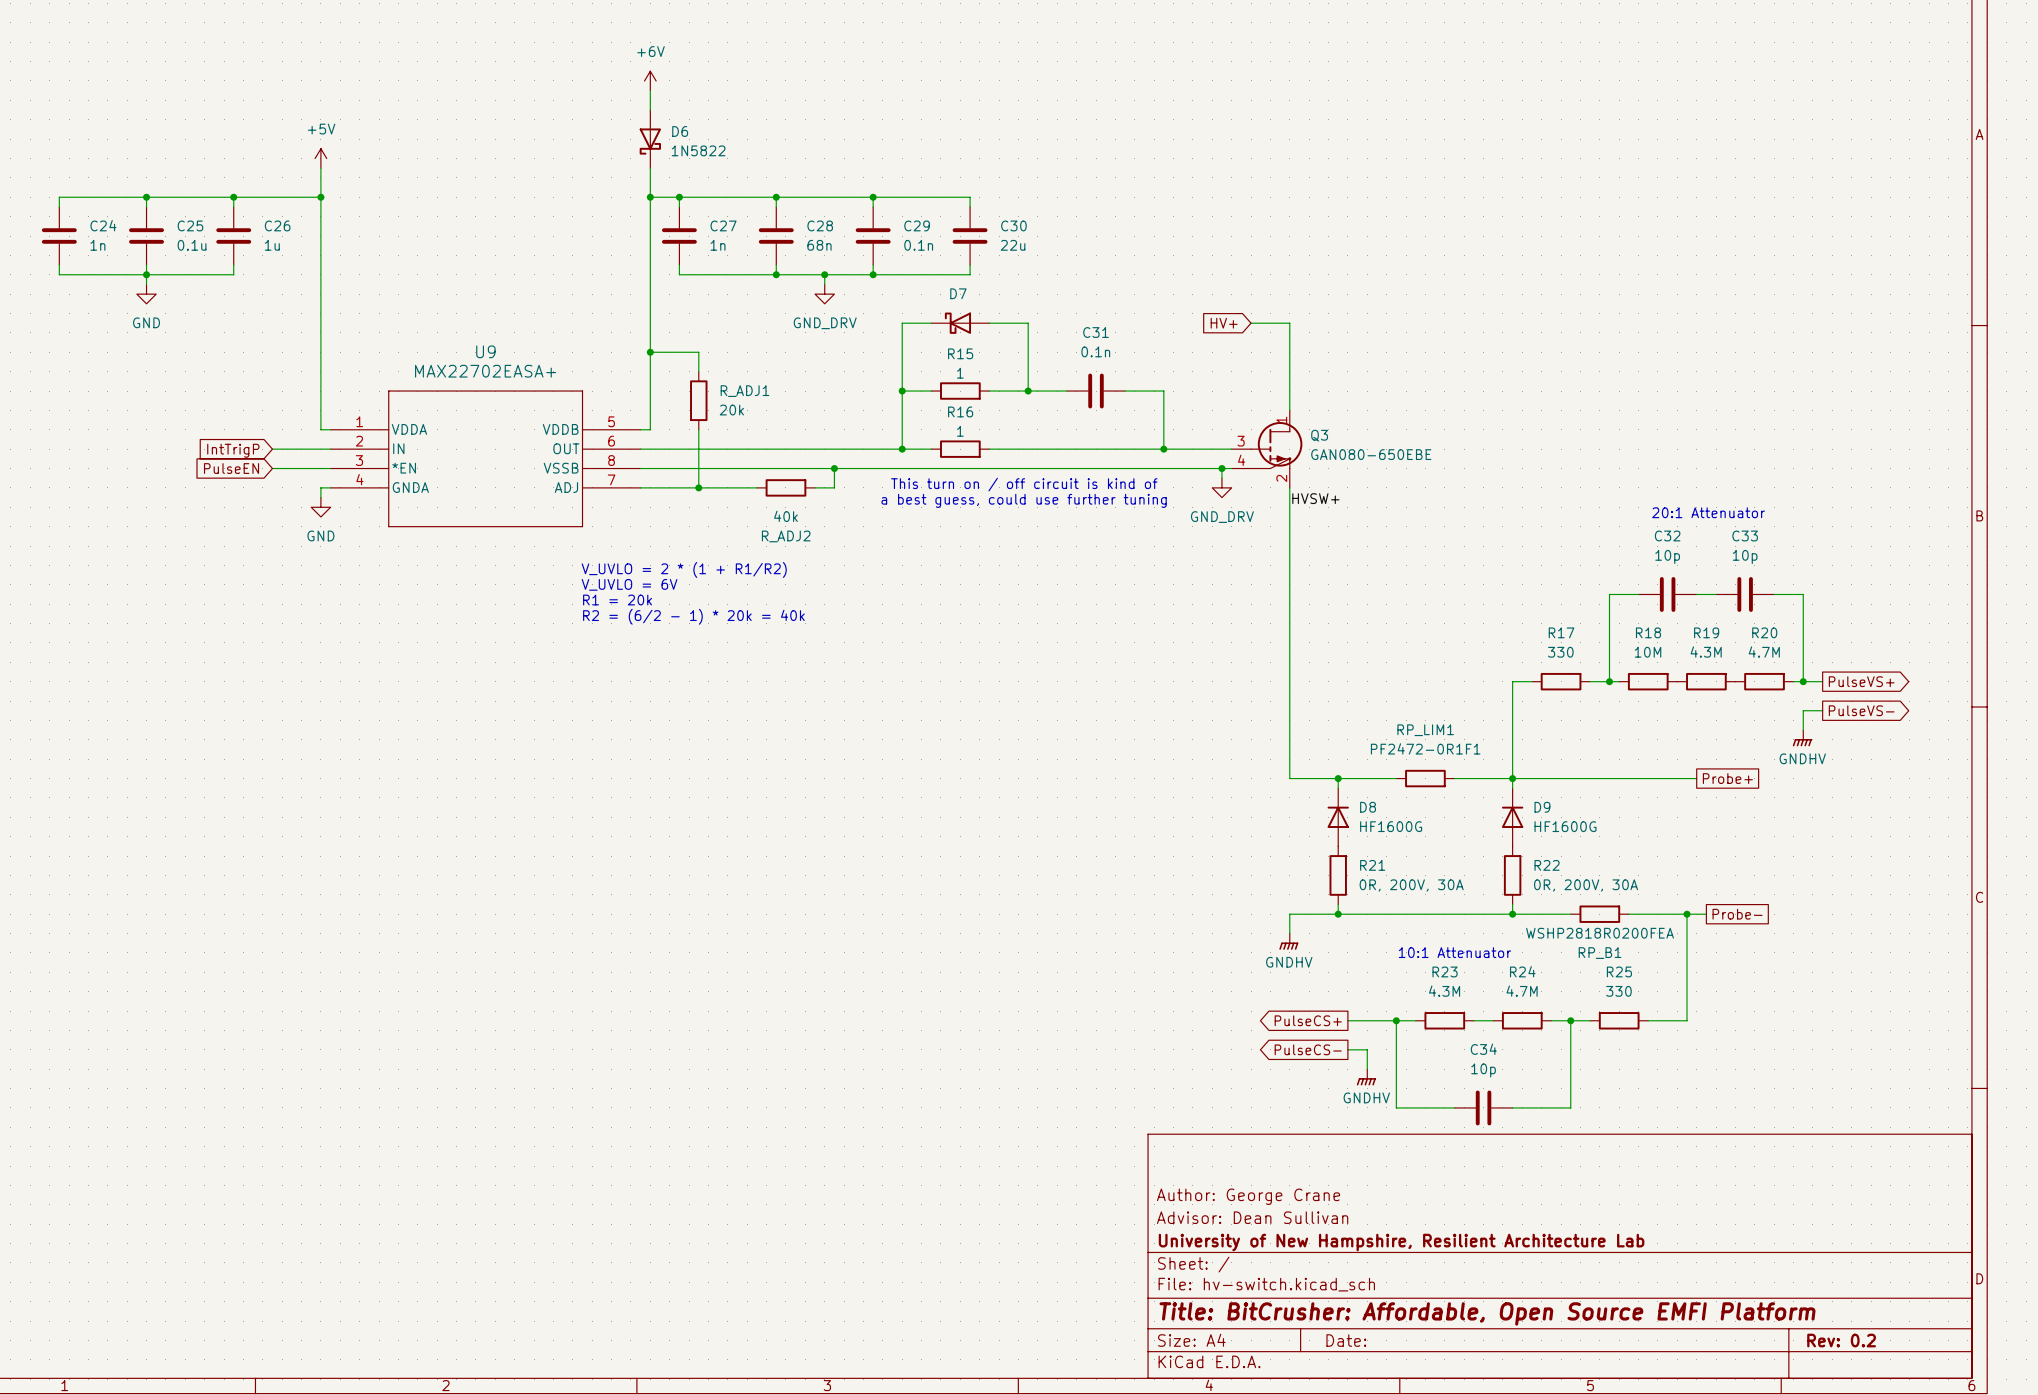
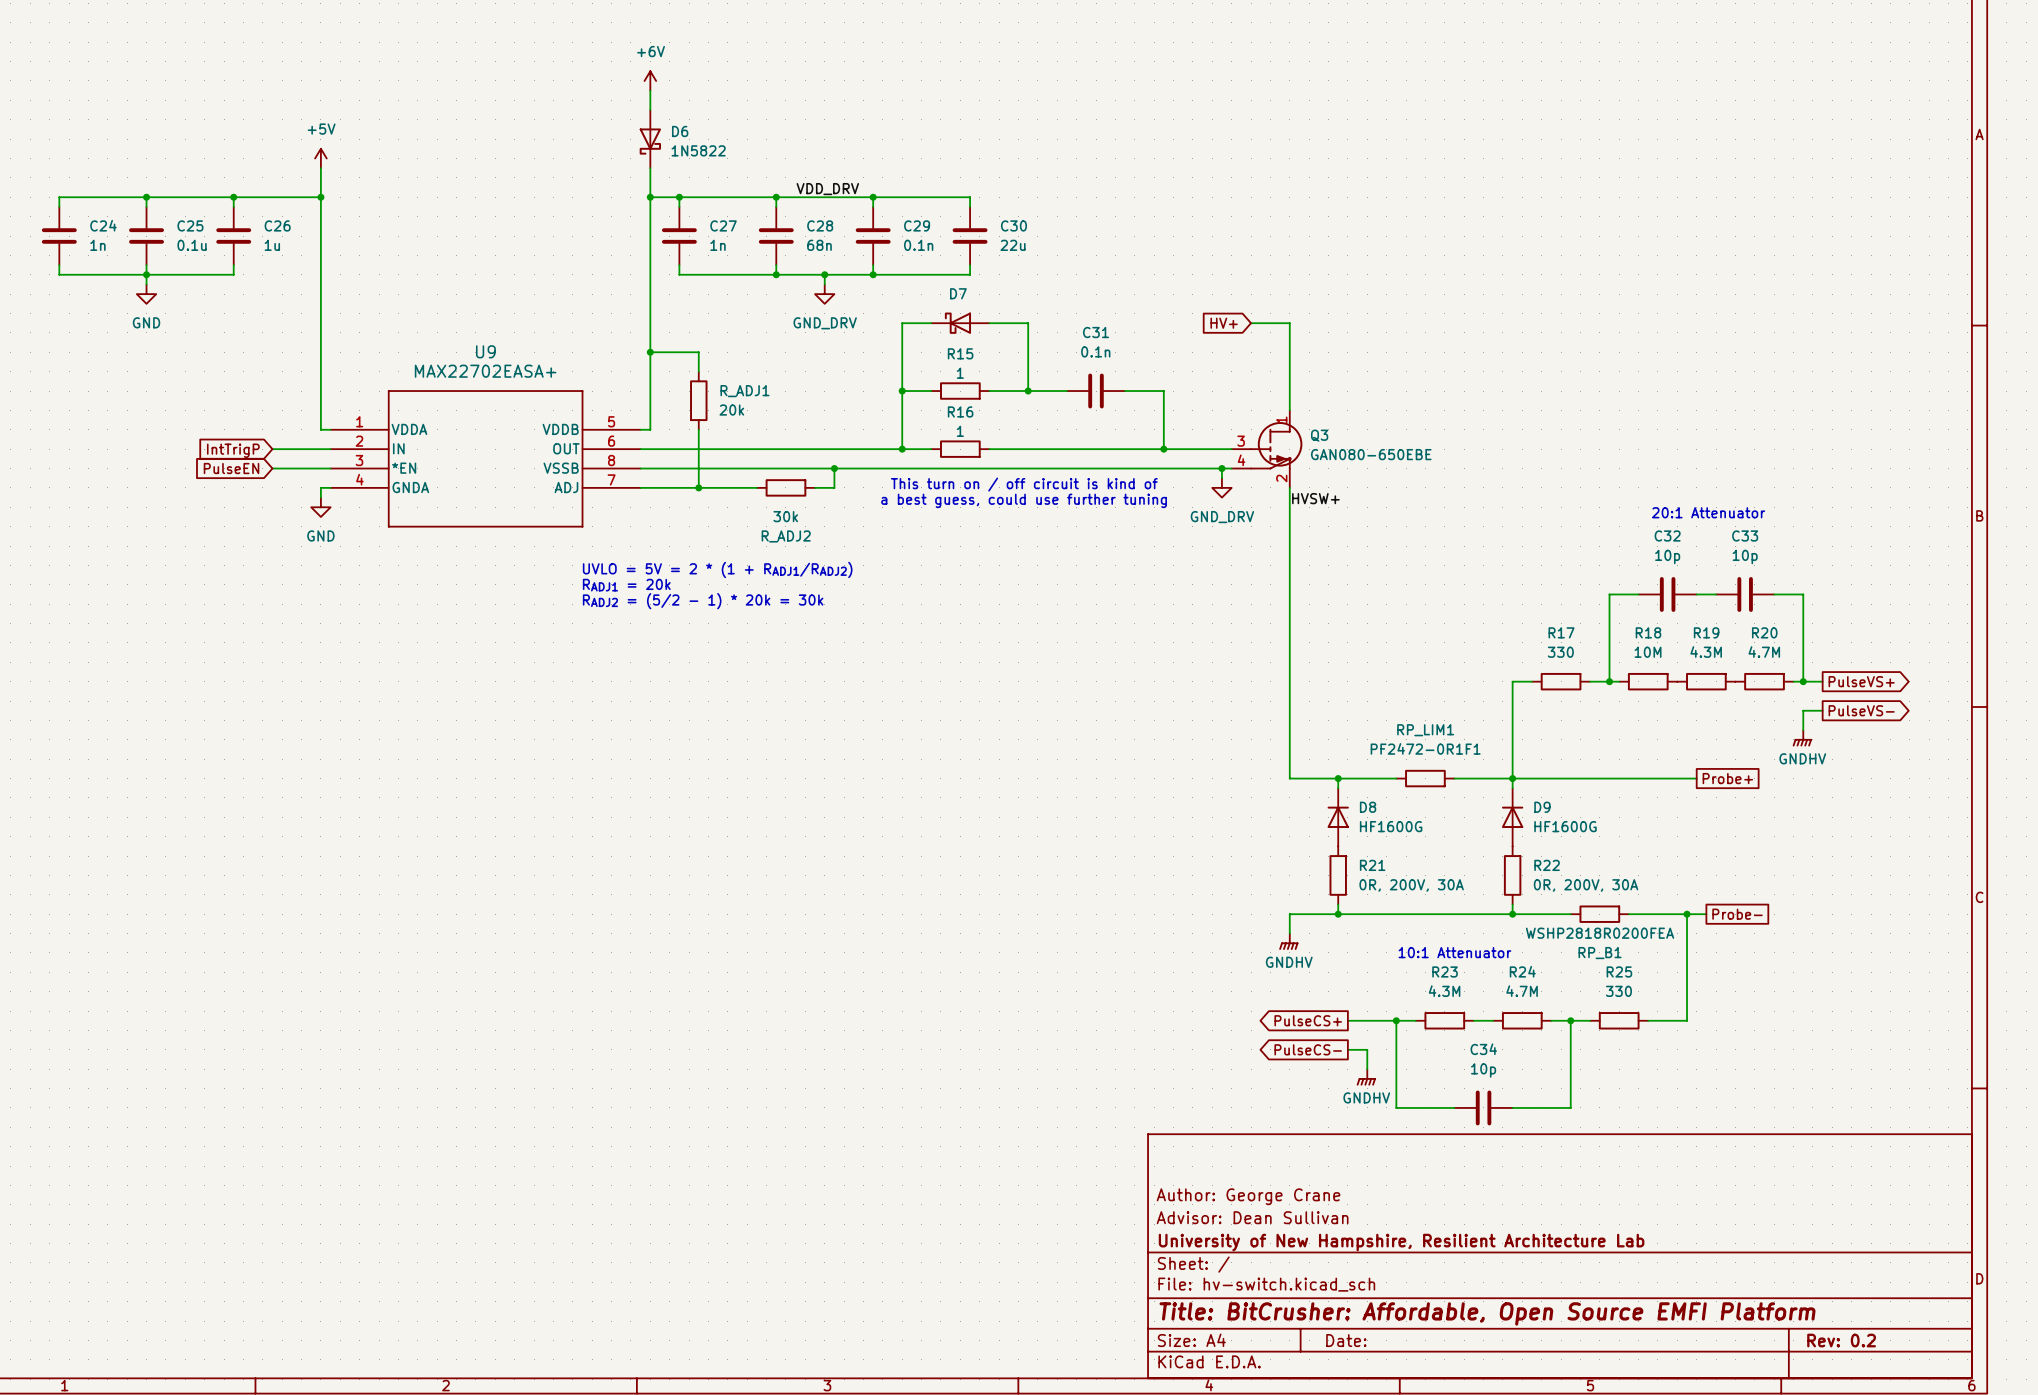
label: none -> VDD_DRV (827, 189)
R_ADJ2 value: 40k (785, 516) -> 30k (785, 516)
text: V_UVLO = 2 * (1 + R1/R2) (684, 569) -> UVLO = 5V = 2 * (1 + RADJ1/RADJ2) (717, 569)
text: V_UVLO = 6V (629, 584) -> RADJ1 = 20k (626, 585)
text: R1 = 20k (617, 600) -> RADJ2 = (5/2 - 1) * 20k = 30k (703, 601)
text: R2 = (6/2 - 1) * 20k = 40k (693, 616) -> none

